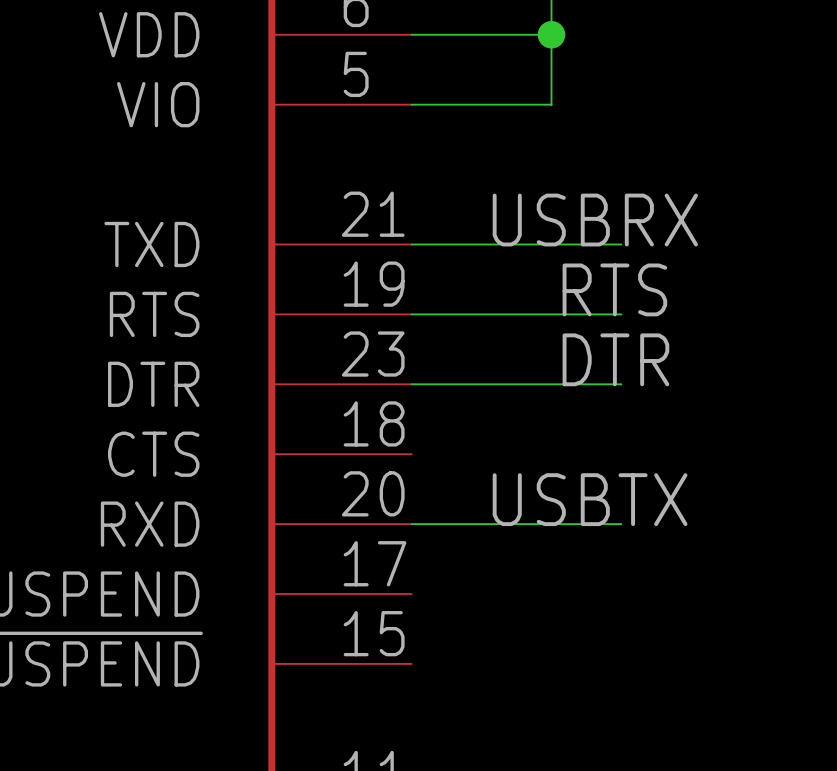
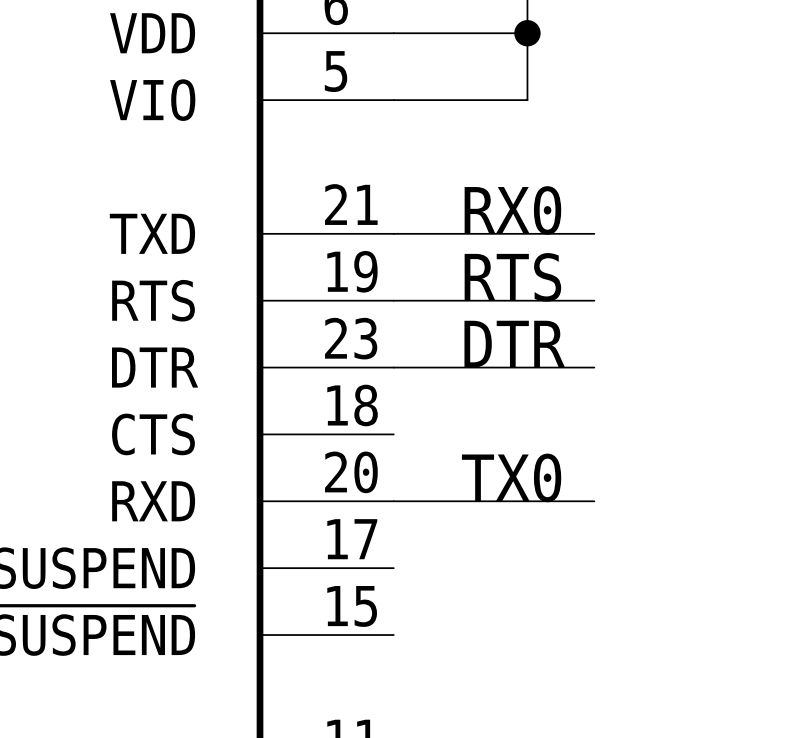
label: USBRX (595, 220) -> RX0 (512, 210)
label position: RTS (614, 289) -> RTS (512, 277)
label position: DTR (615, 359) -> DTR (514, 344)
label: USBTX (590, 499) -> TX0 (511, 477)

